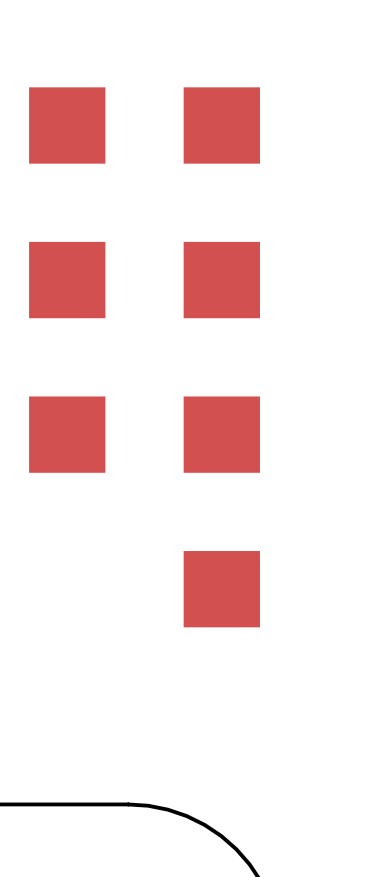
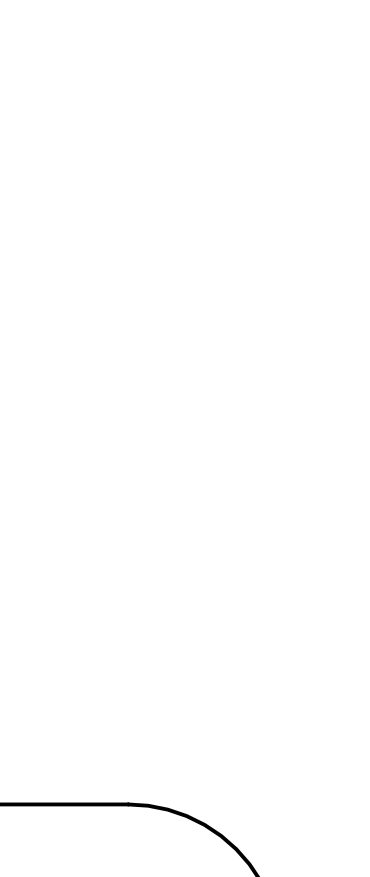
part: (67, 125) -> none
part: (221, 125) -> none
part: (67, 280) -> none
part: (221, 280) -> none
part: (67, 434) -> none
part: (221, 434) -> none
part: (221, 589) -> none

